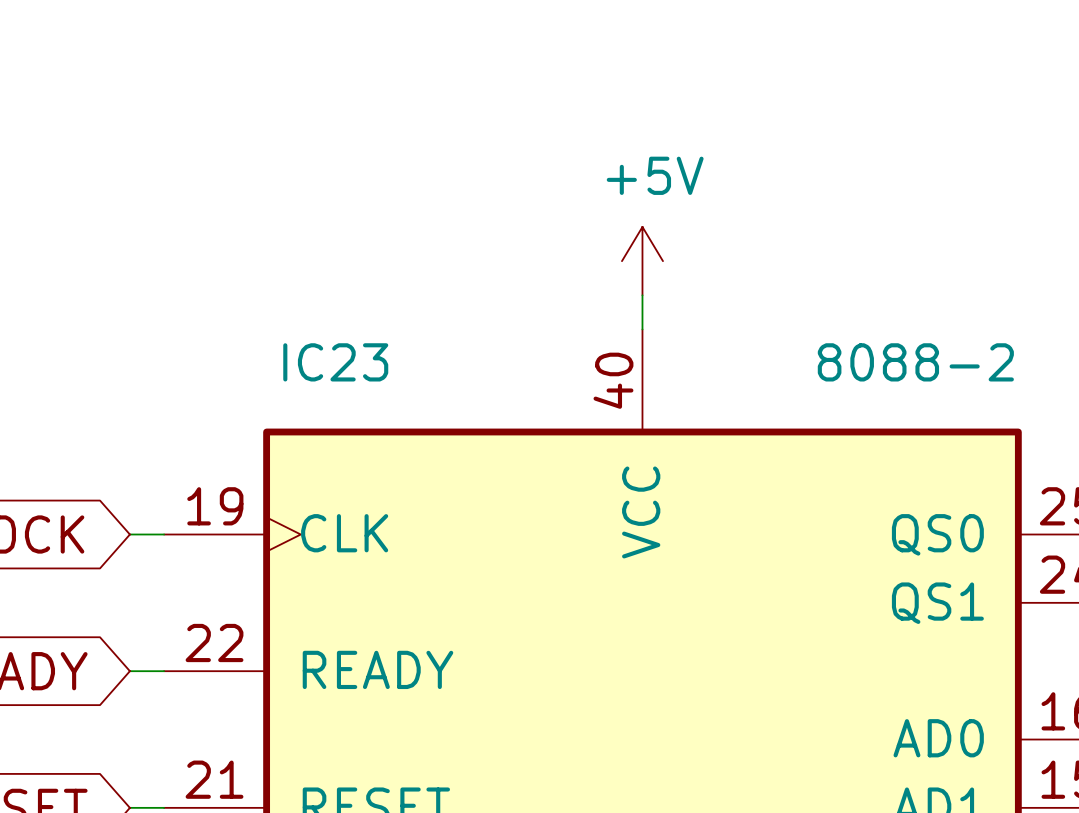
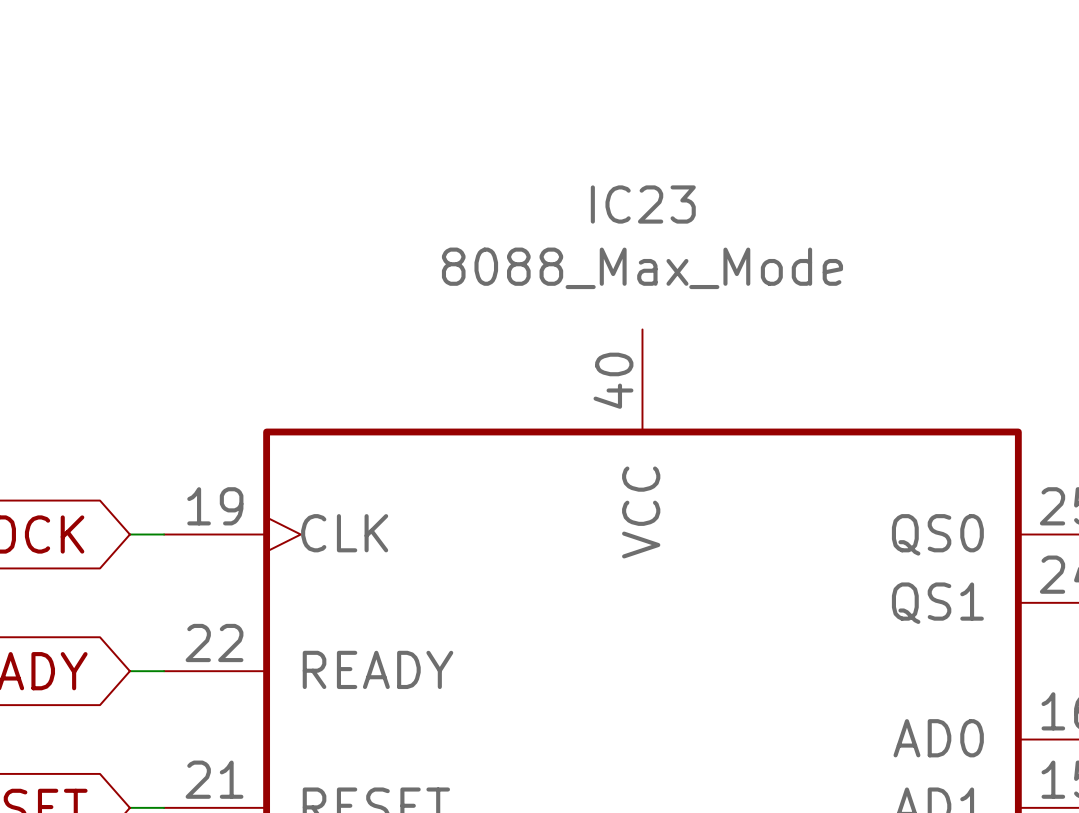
power symbol: +5V (642, 261) -> none
wire: (642, 295) (642, 329) -> none
IC23 name position: IC23 (335, 362) -> IC23 (643, 204)
IC23 value: 8088-2 (915, 362) -> 8088_Max_Mode (642, 268)

